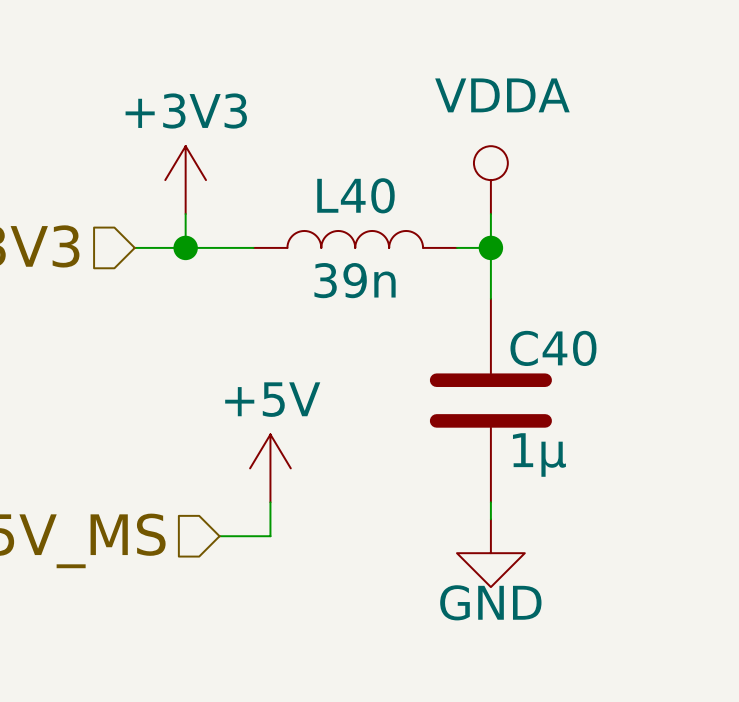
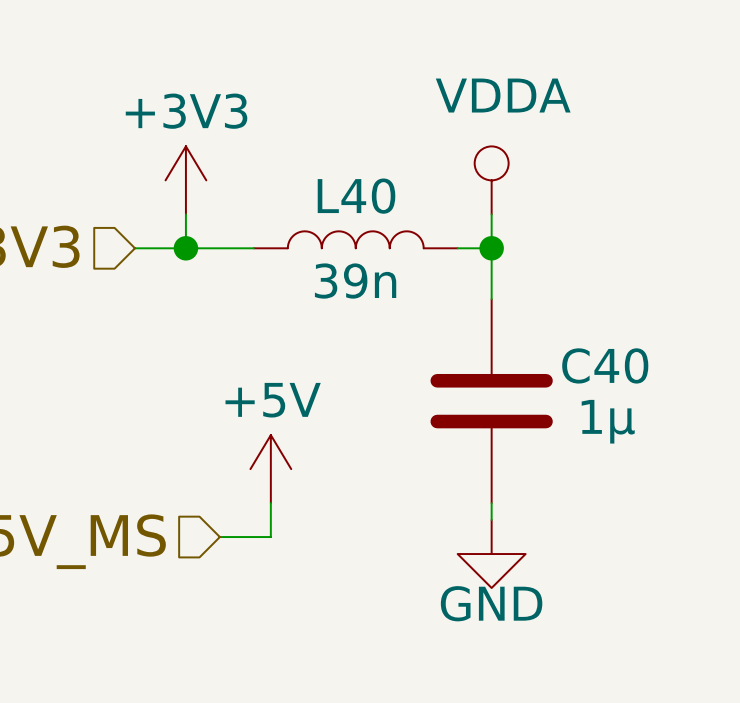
C40 name position: C40 (553, 348) -> C40 (605, 365)
C40 value position: 1µ (539, 455) -> 1µ (608, 421)

